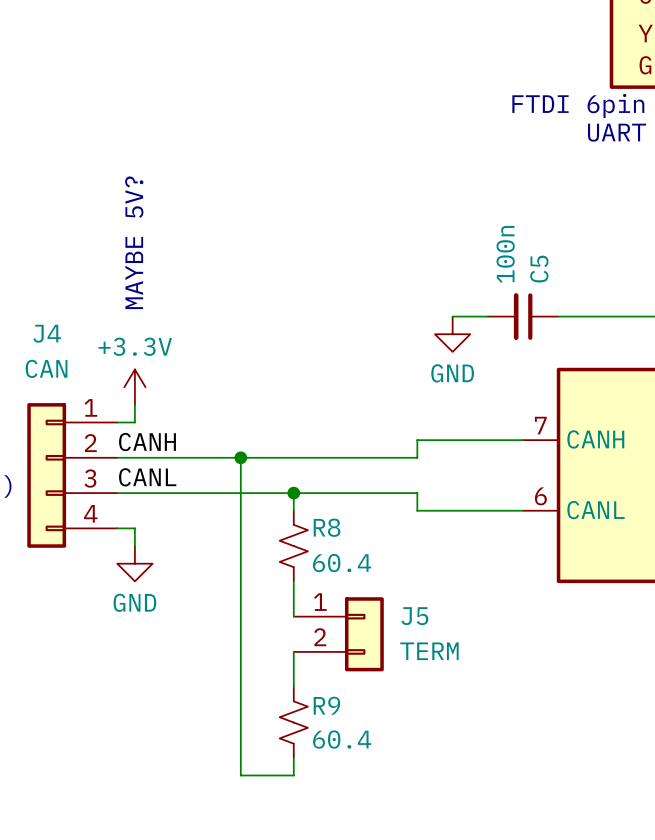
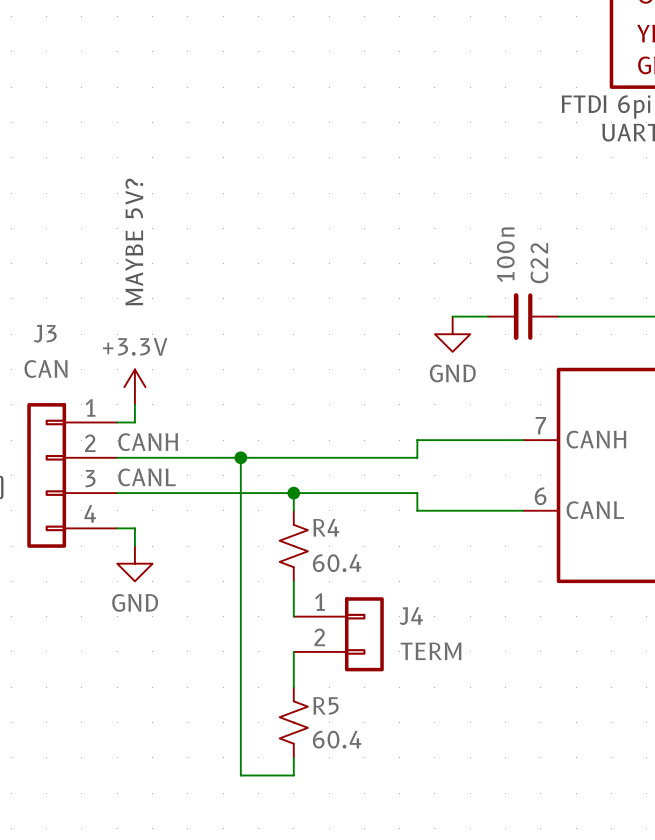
C5 name: C5 (539, 269) -> C22 (539, 263)
J4 name: J4 (47, 333) -> J3 (45, 333)
R8 name: R8 (327, 527) -> R4 (326, 527)
J5 name: J5 (414, 616) -> J4 (411, 616)
R9 name: R9 (326, 705) -> R5 (325, 705)

